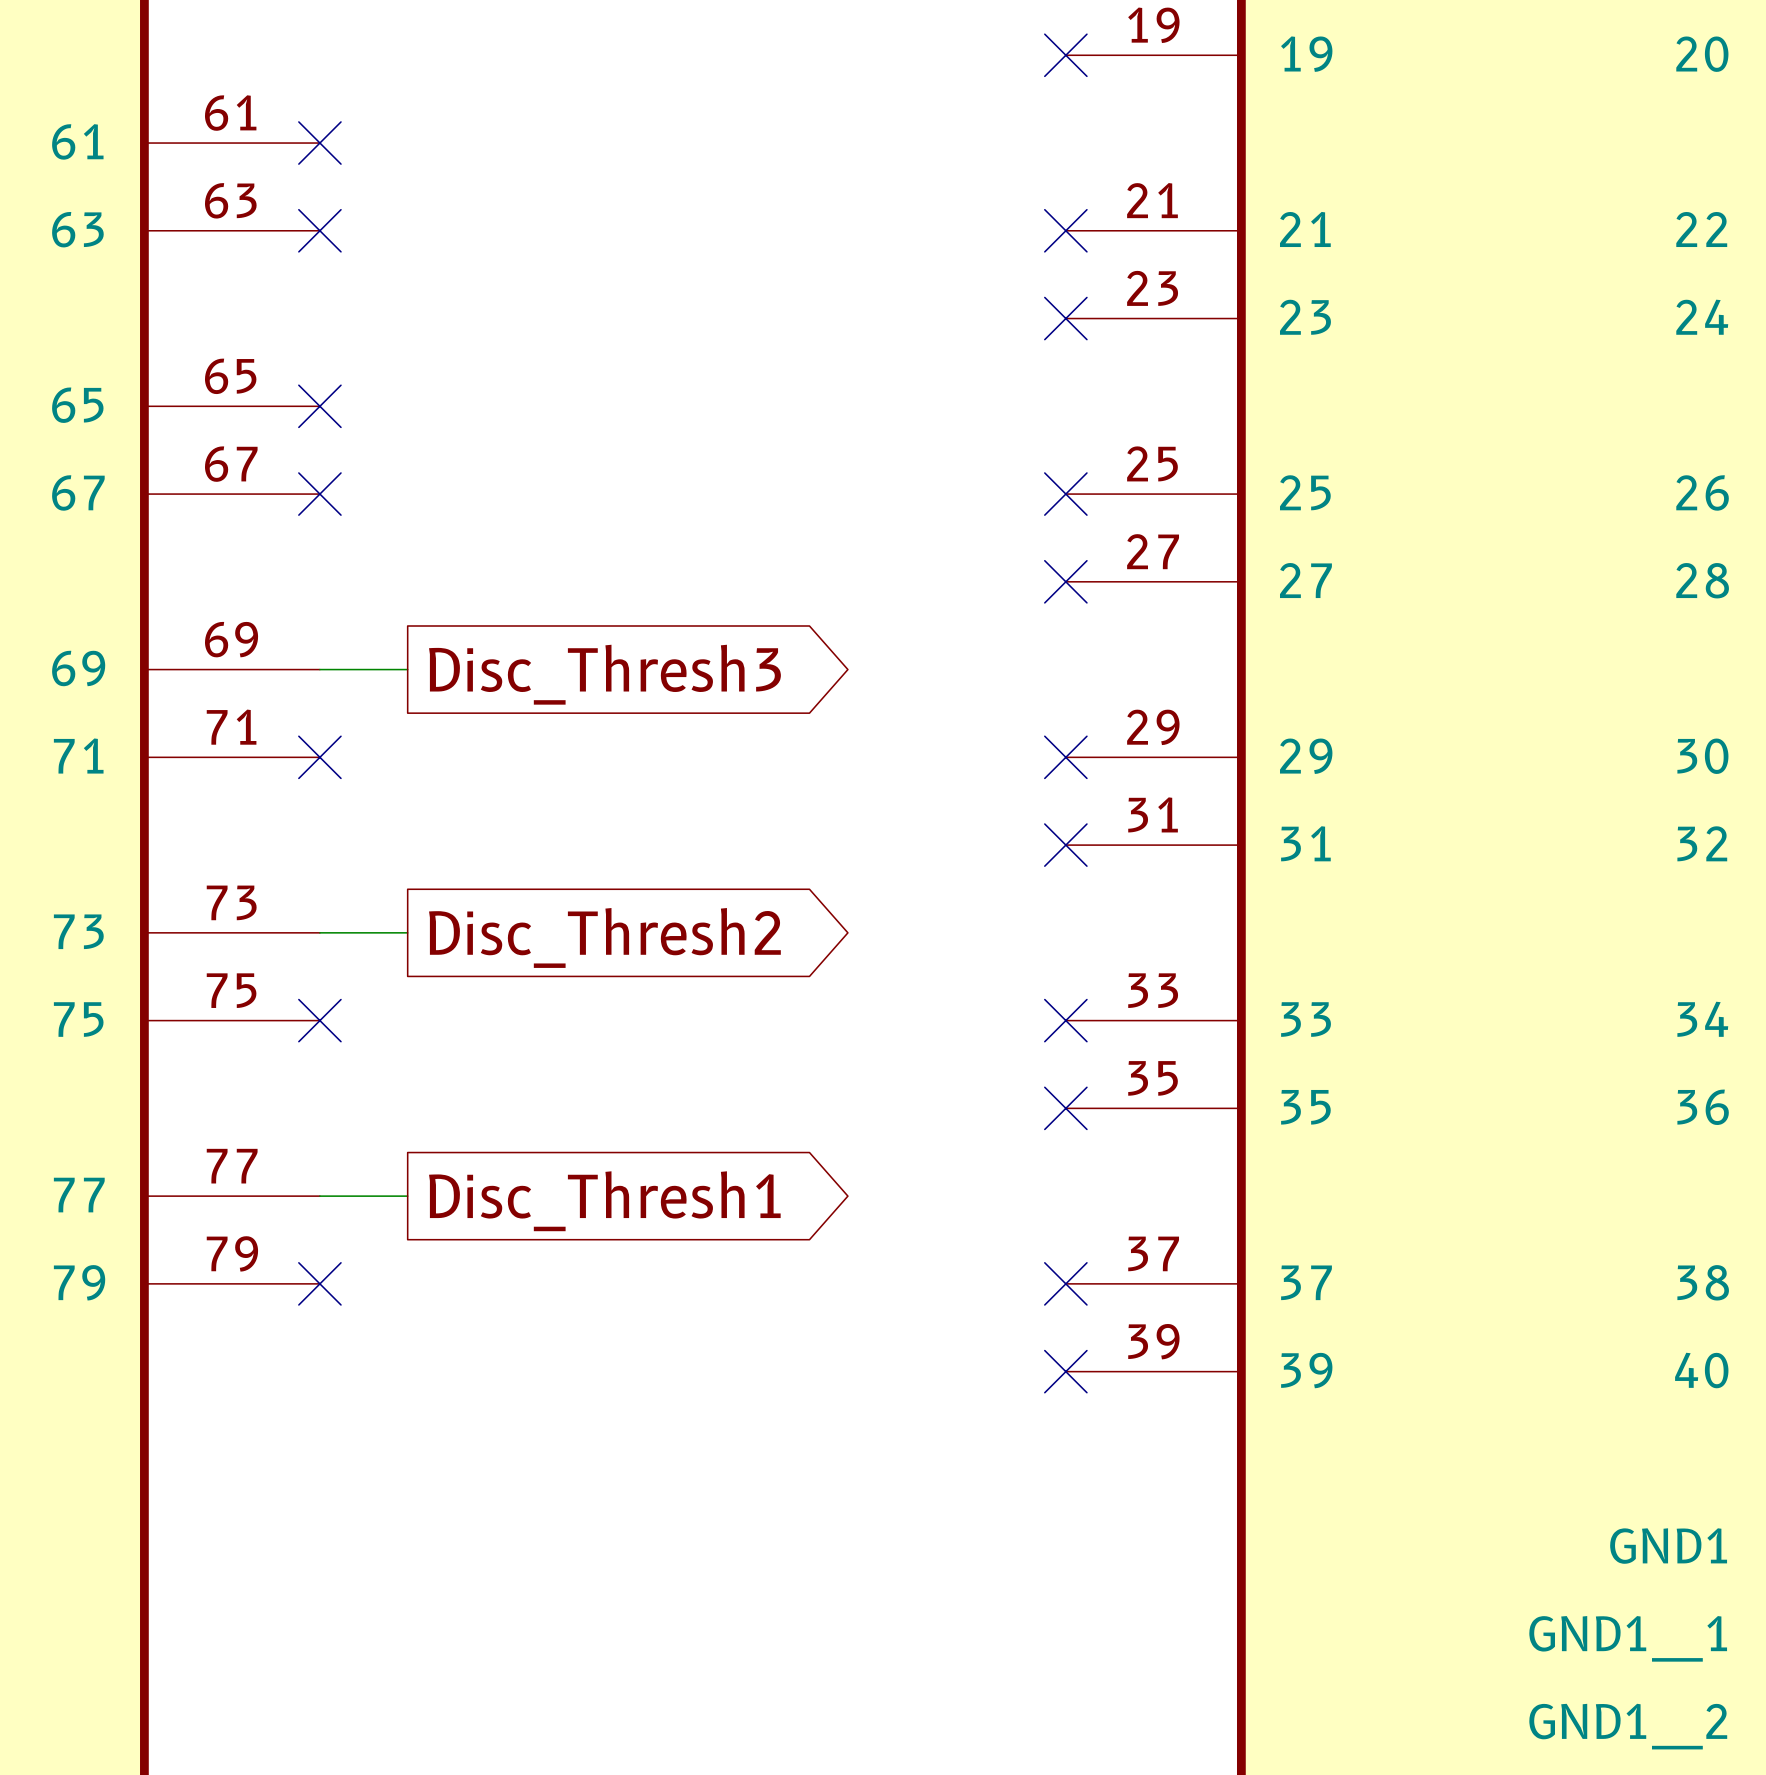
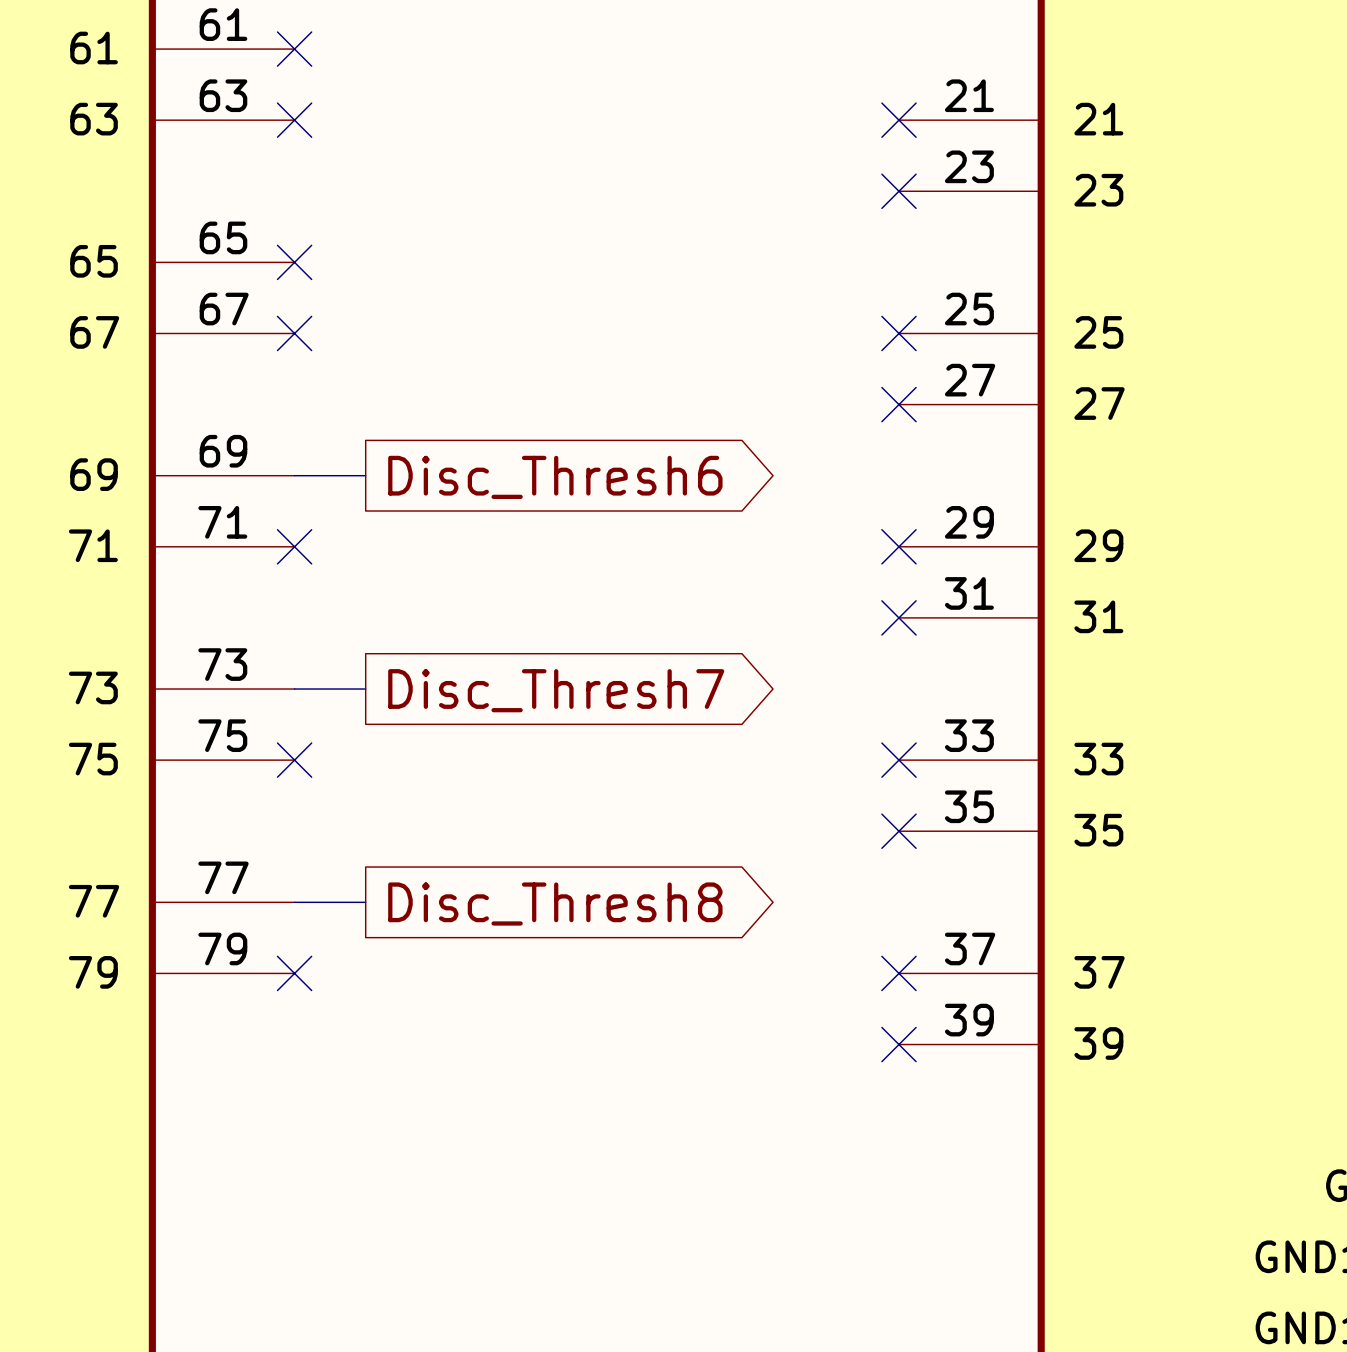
global label: Disc_Thresh3 (604, 674) -> Disc_Thresh6 (555, 477)
global label: Disc_Thresh2 (604, 937) -> Disc_Thresh7 (556, 690)
global label: Disc_Thresh1 (604, 1201) -> Disc_Thresh8 (555, 904)

